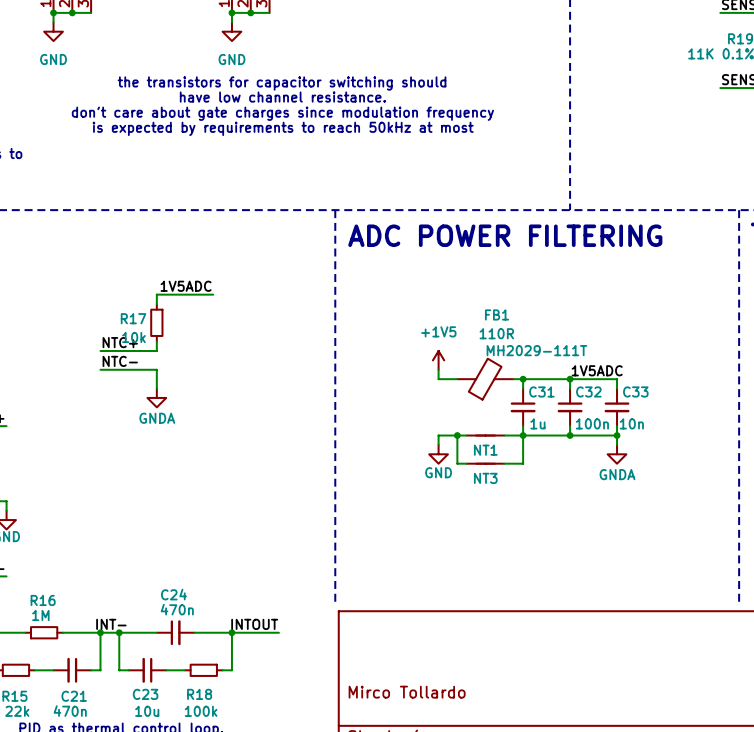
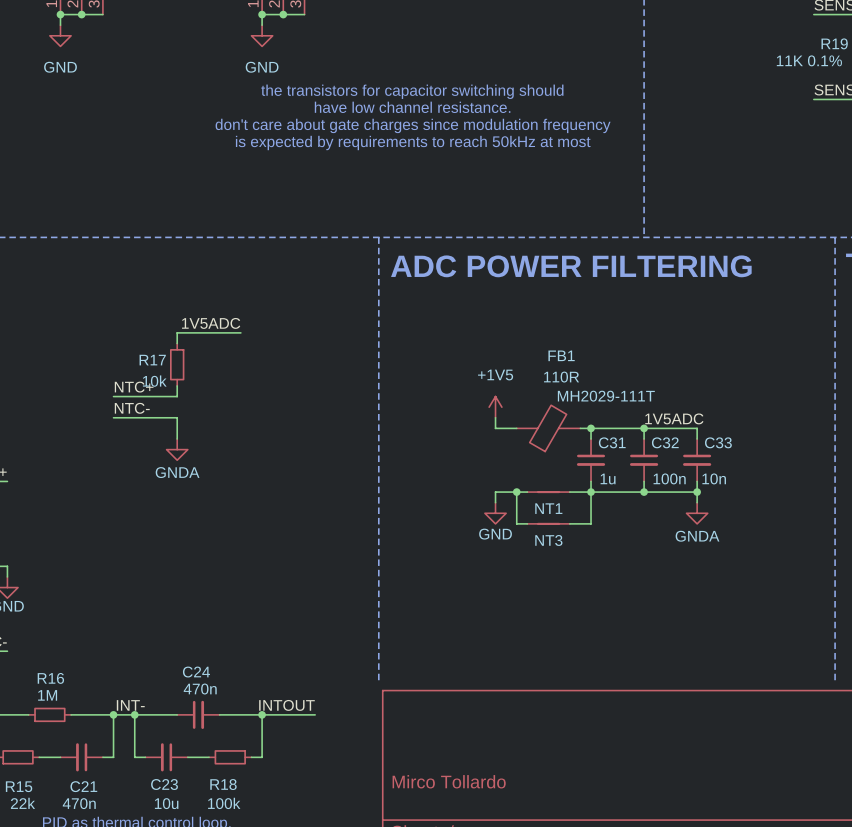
text position: the transistors for capacitor switching should (282, 83) -> the transistors for capacitor switching should (412, 91)
text position: have low channel resistance. (282, 97) -> have low channel resistance. (412, 107)
text position: don't care about gate charges since modulation frequency (282, 113) -> don't care about gate charges since modulation frequency (413, 125)
text position: is expected by requirements to reach 50kHz at most (283, 128) -> is expected by requirements to reach 50kHz at most (413, 143)

